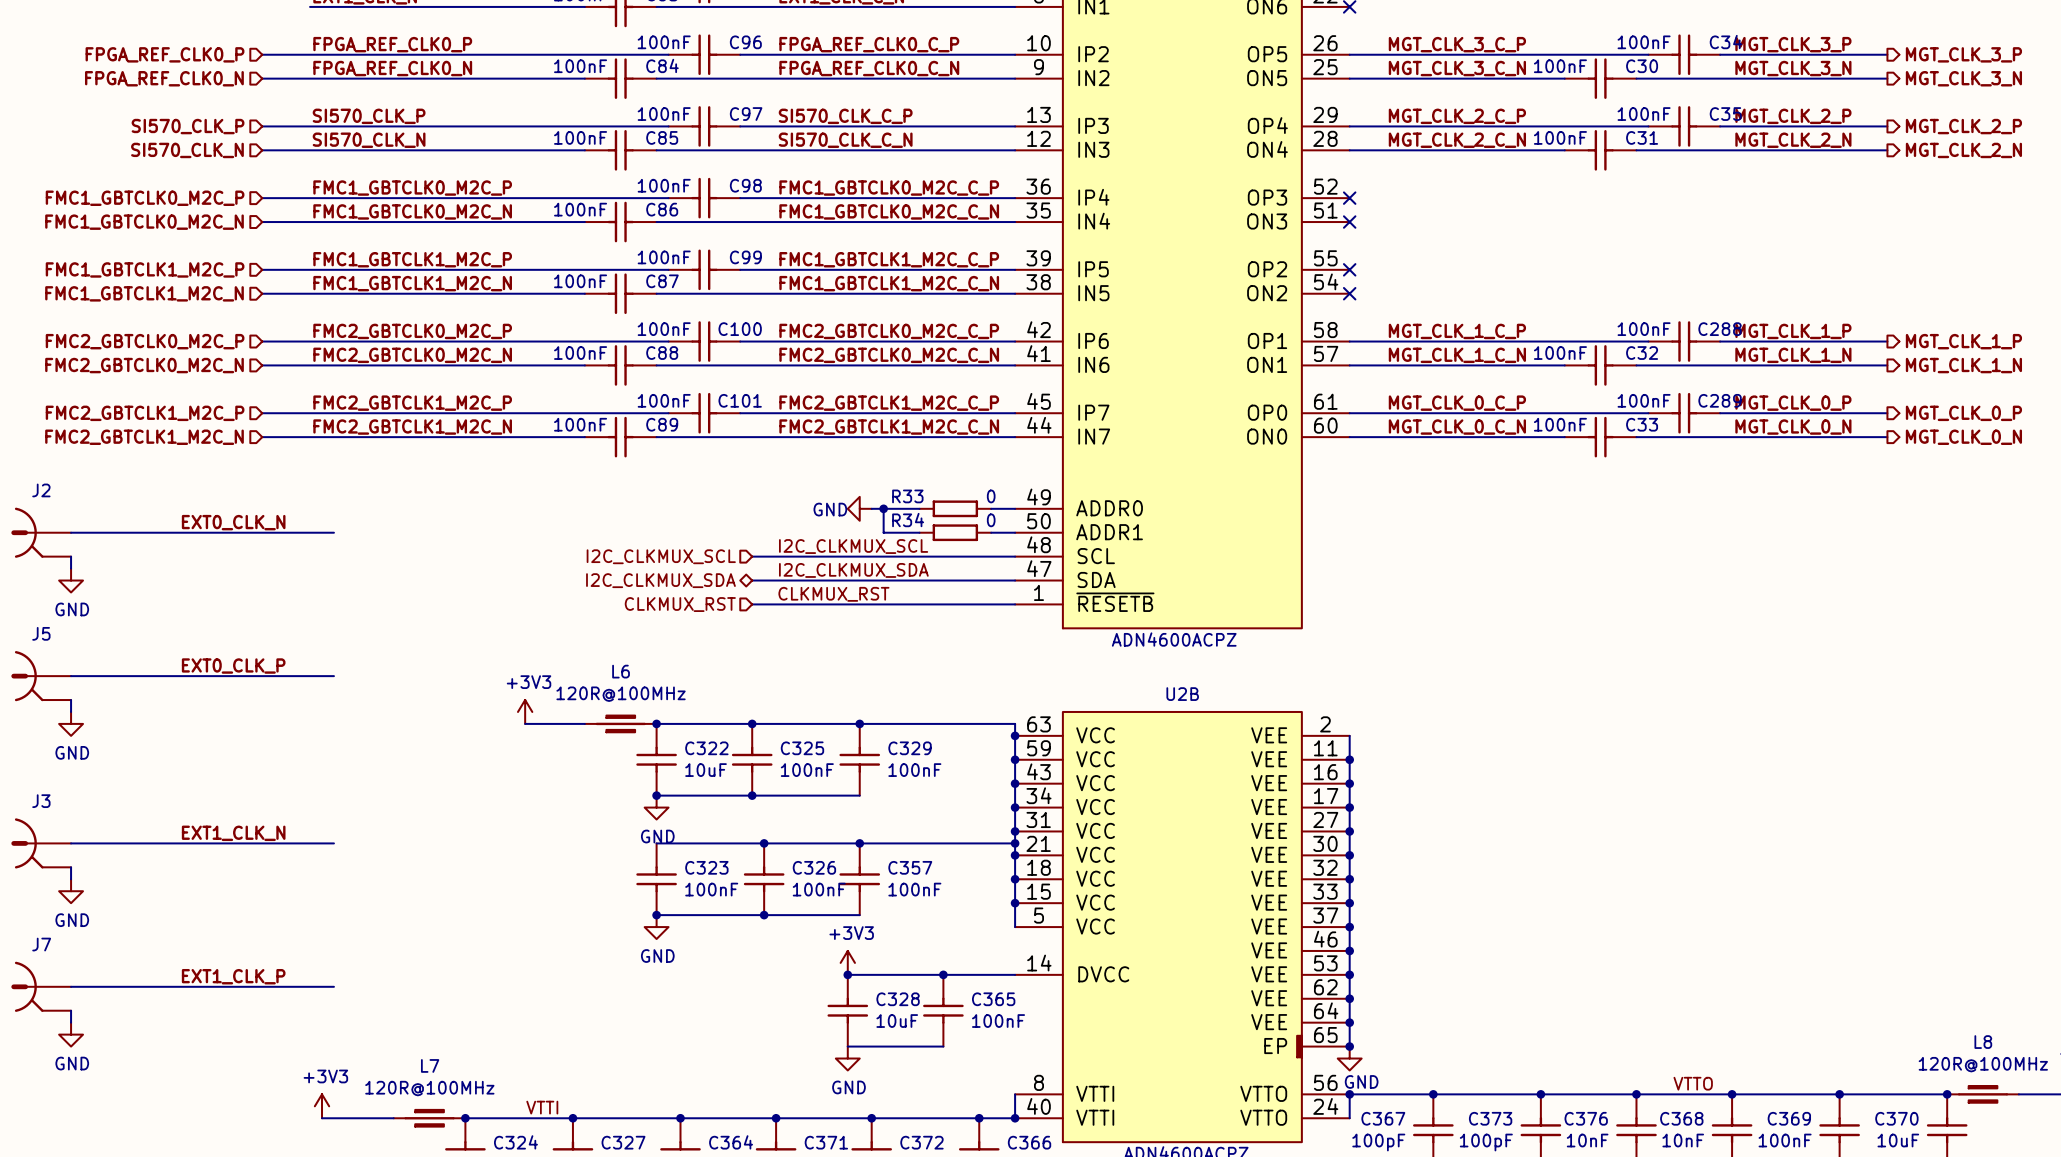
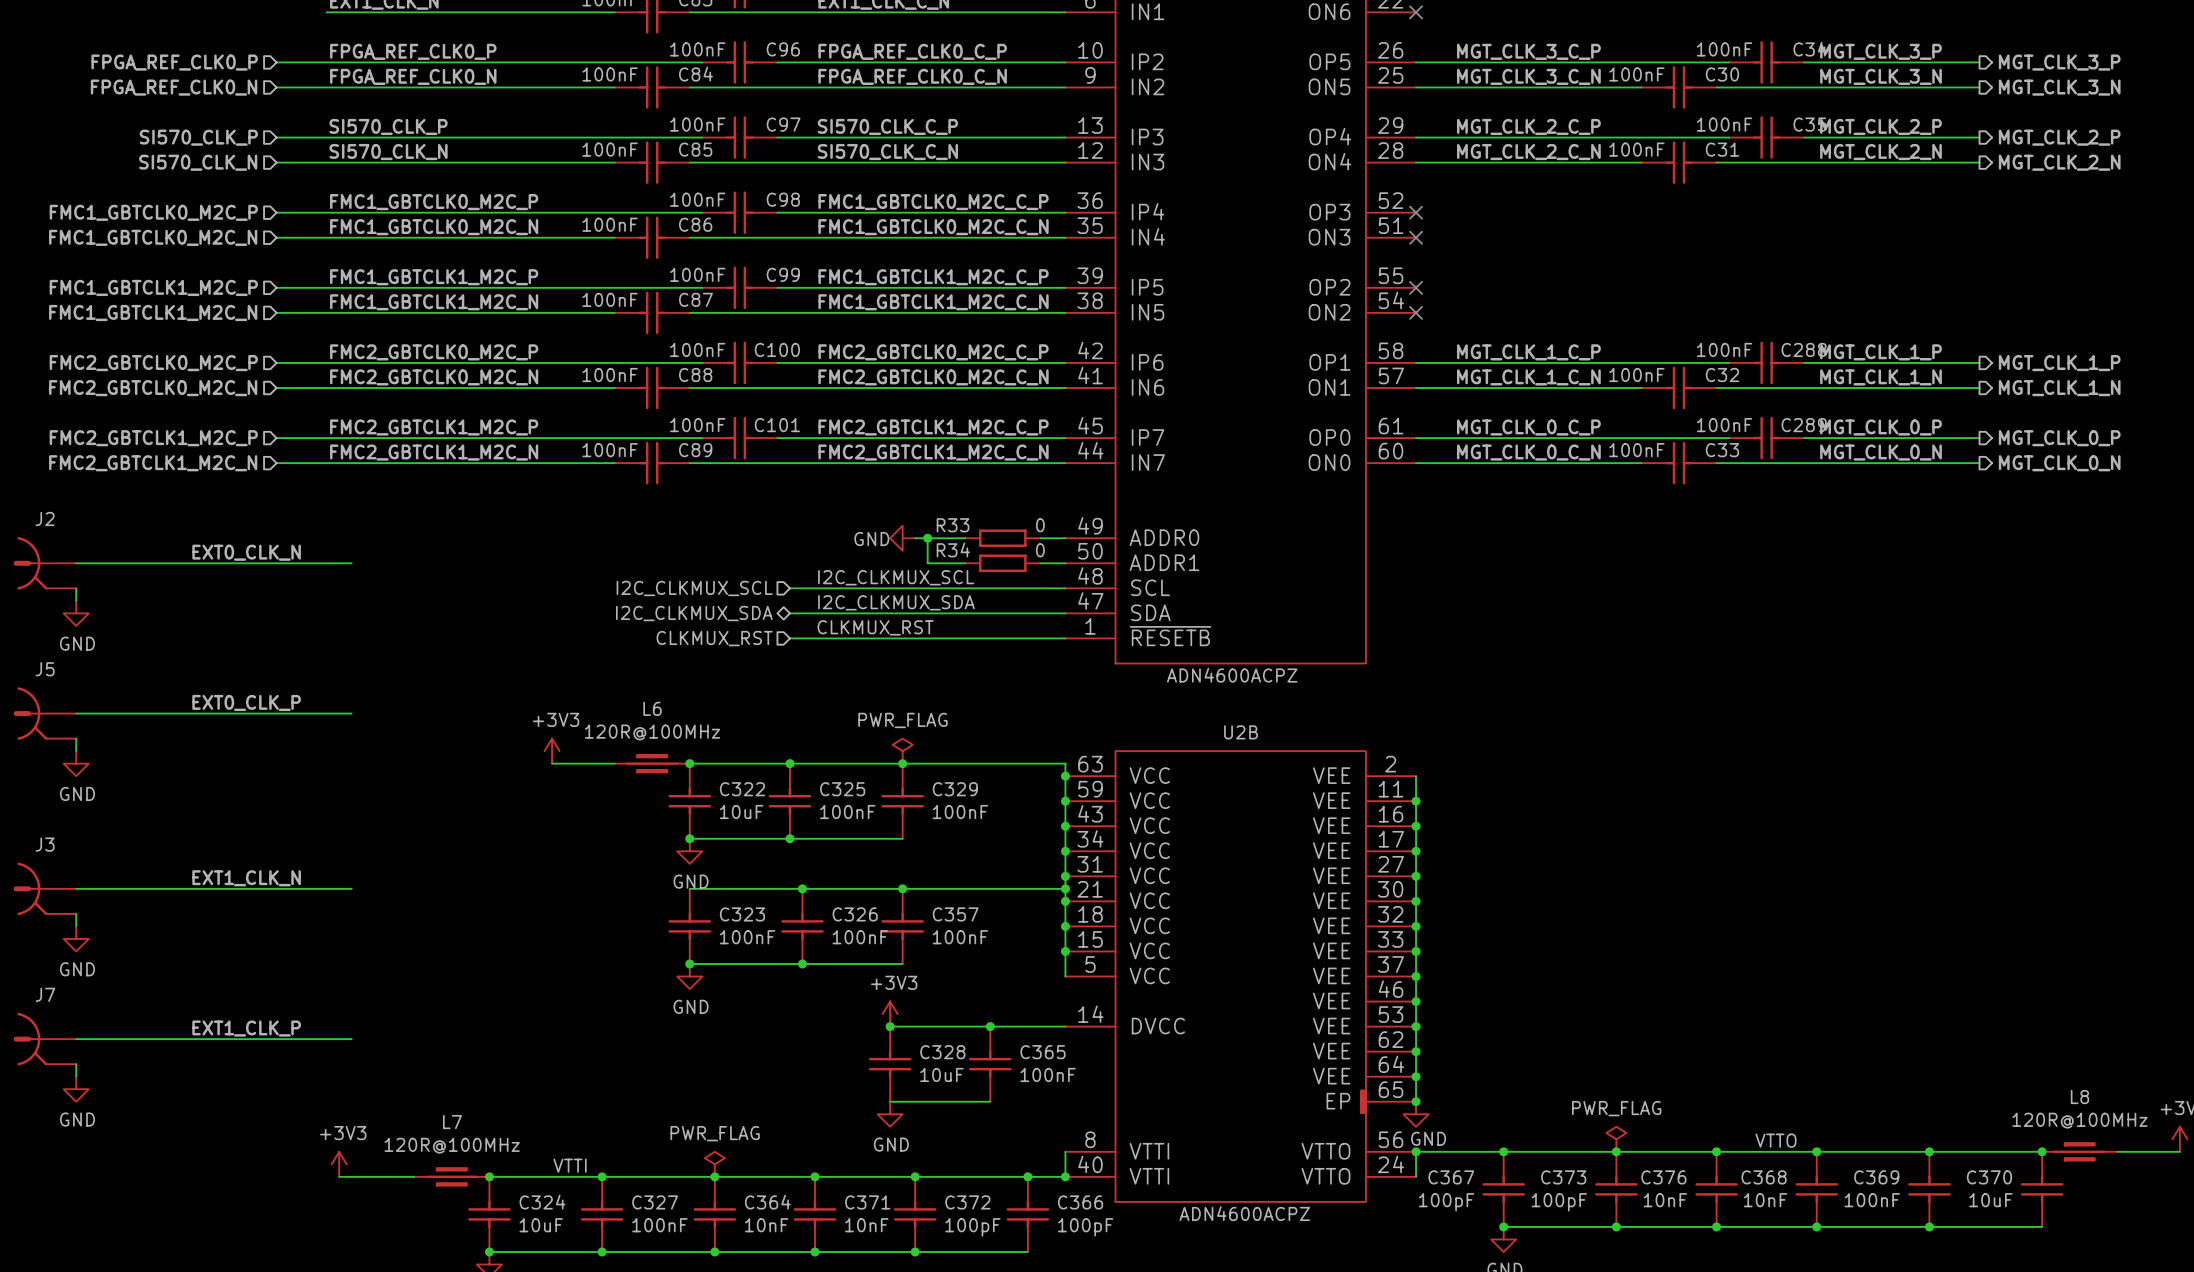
power symbol: none -> PWR_FLAG (902, 751)
power symbol: none -> PWR_FLAG (1616, 1139)
power symbol: none -> PWR_FLAG (714, 1164)

